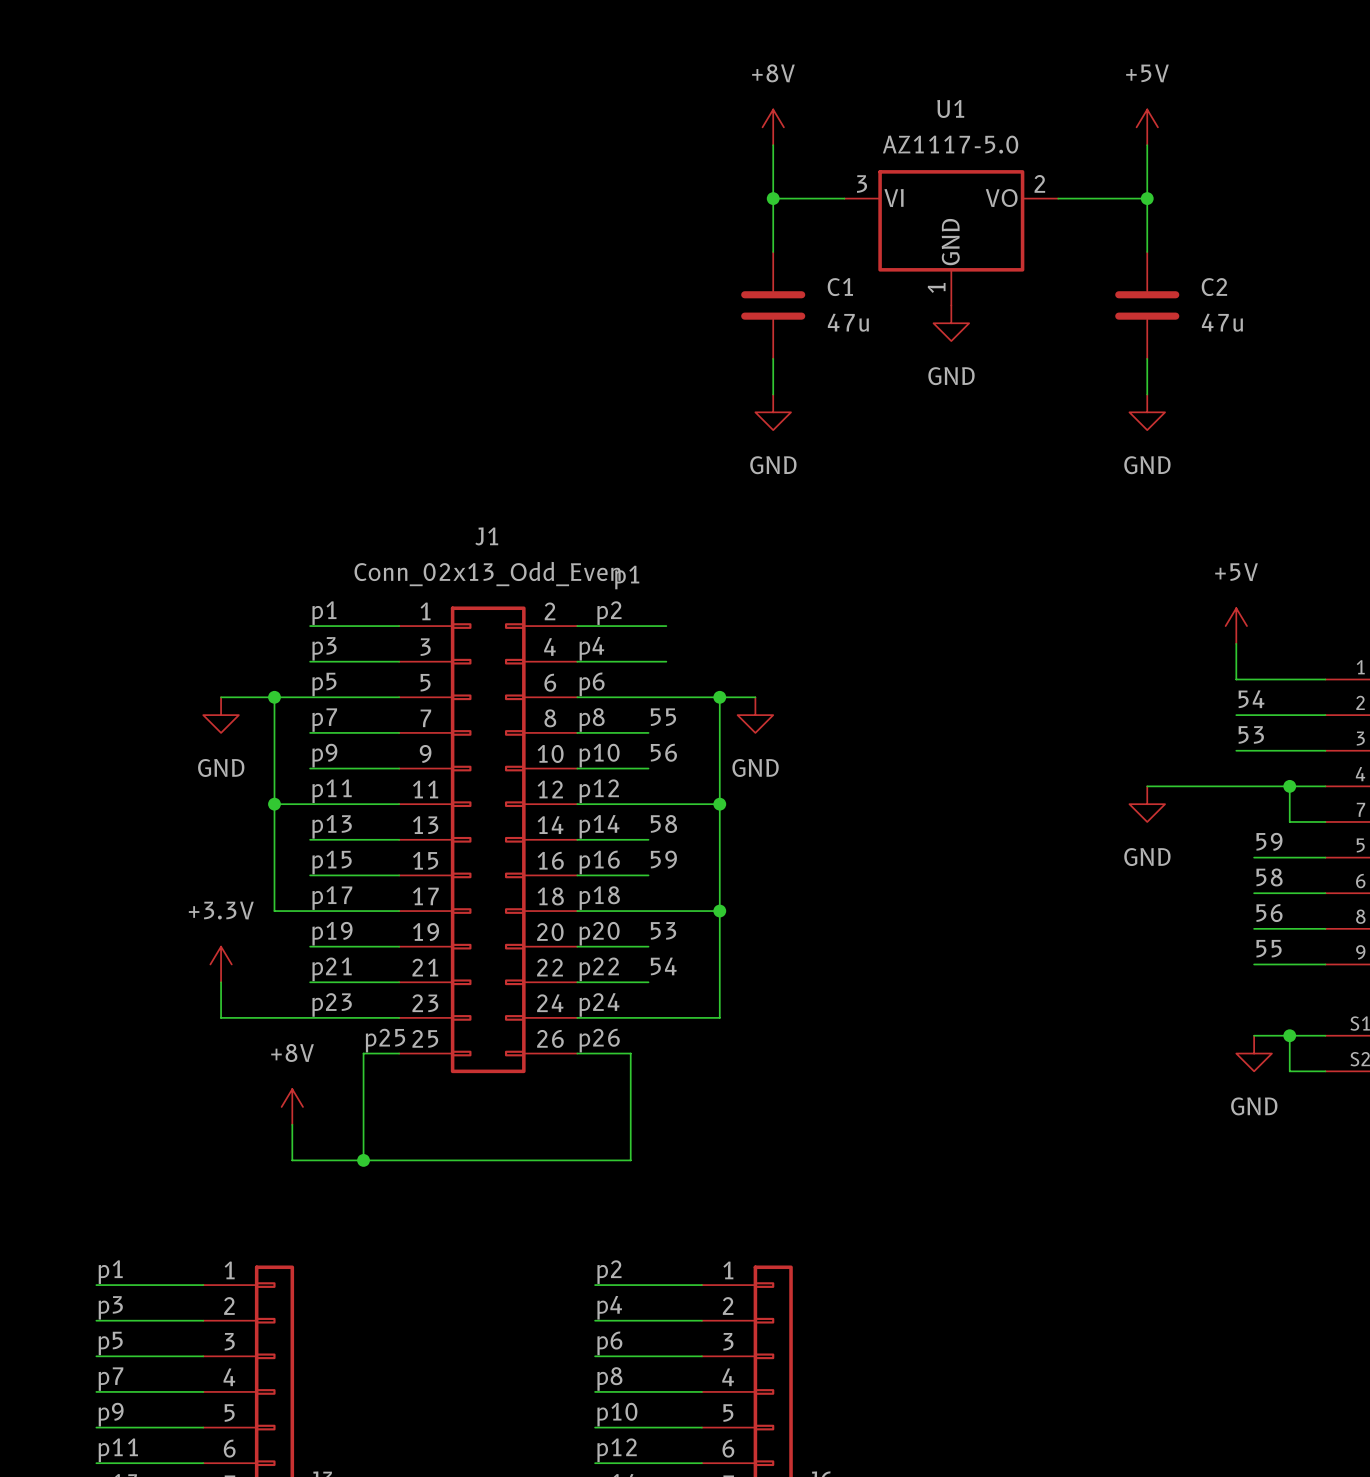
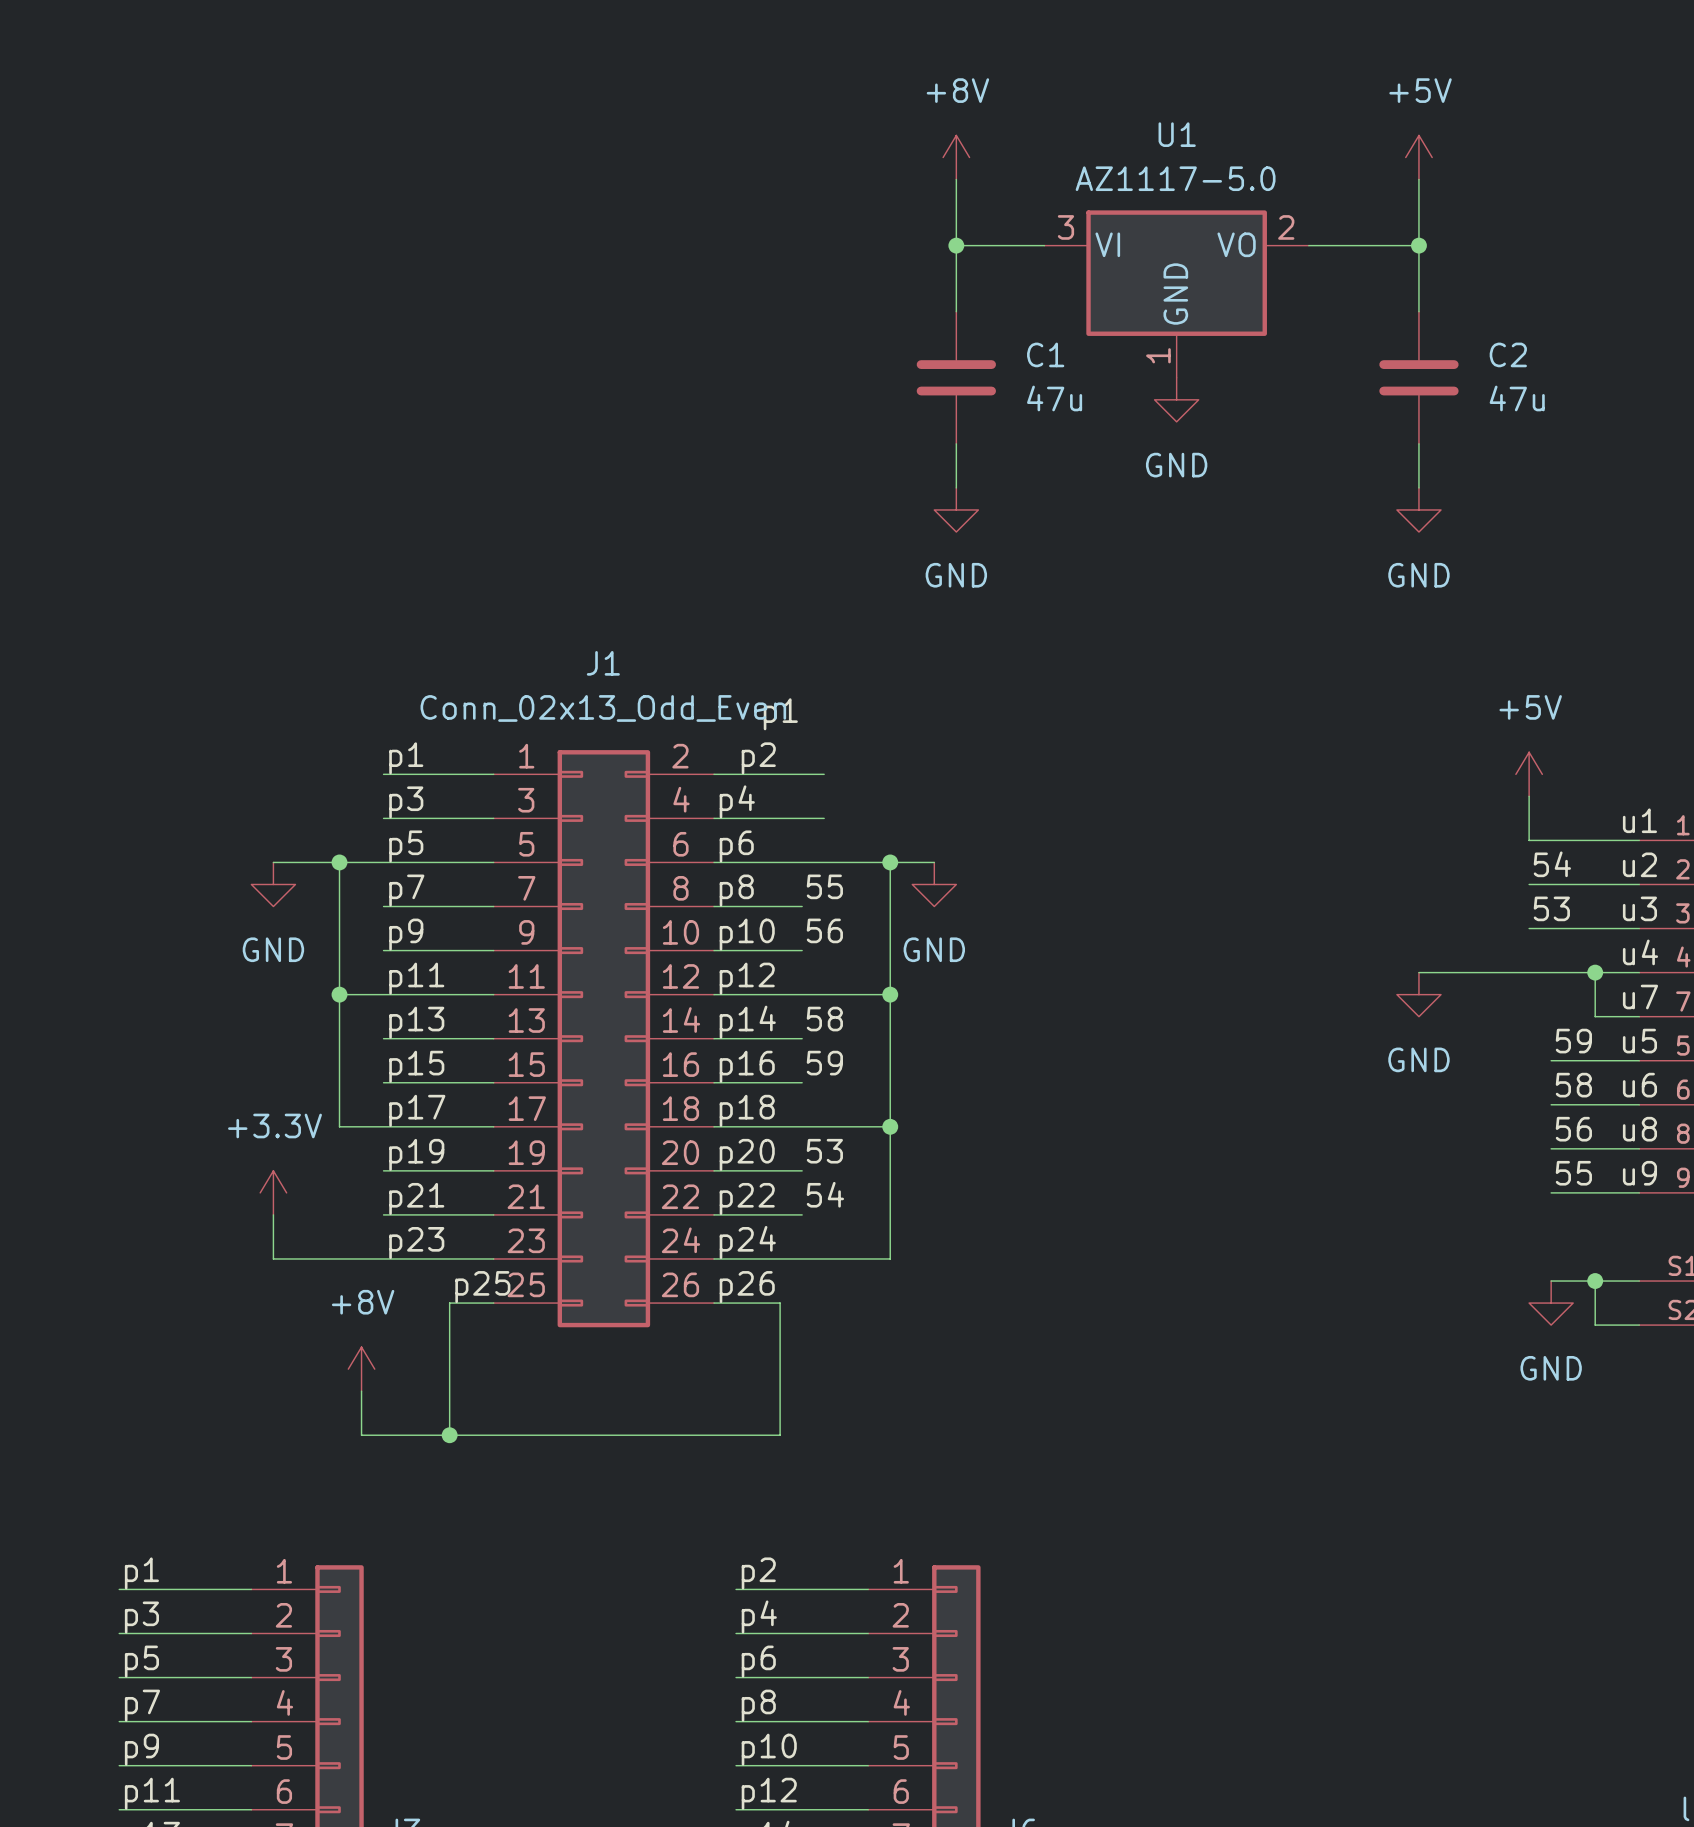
label: none -> u1 (1639, 820)
label: none -> u2 (1639, 864)
label: none -> u3 (1639, 908)
label: none -> u4 (1640, 952)
label: none -> u7 (1640, 997)
label: none -> u5 (1639, 1041)
label: none -> u6 (1639, 1085)
label: none -> u8 (1639, 1129)
label: none -> u9 (1639, 1173)

